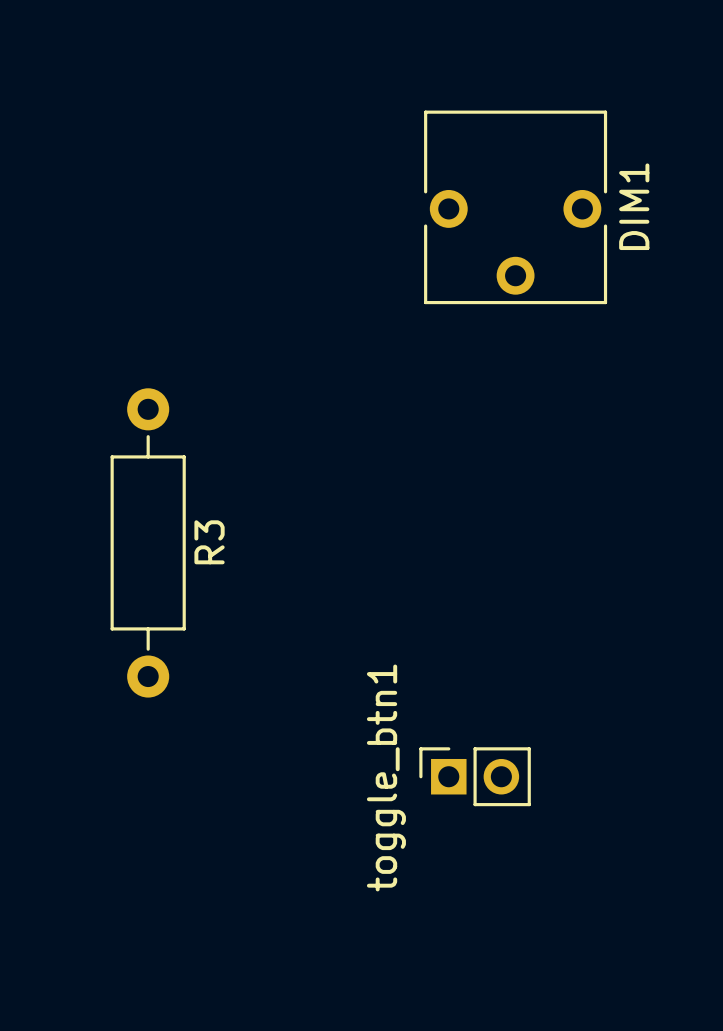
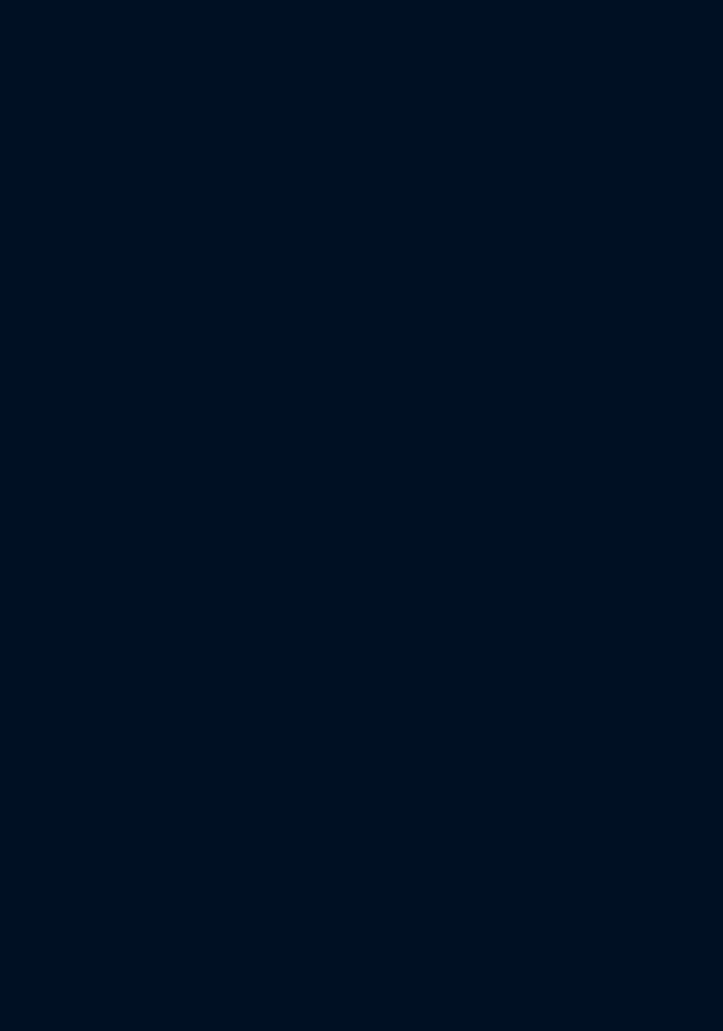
DIM1: (515, 207) -> none
R3: (148, 542) -> none
toggle_btn1: (475, 776) -> none

